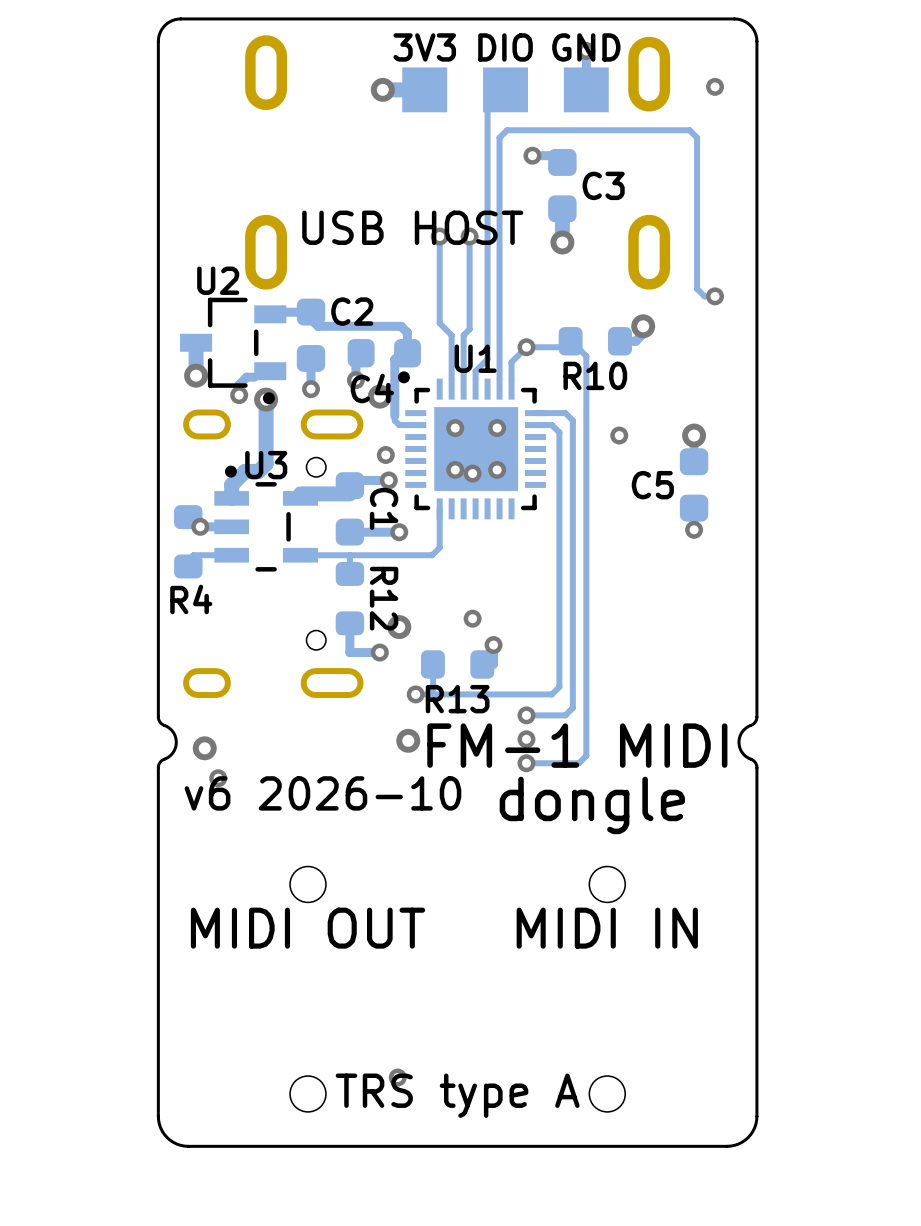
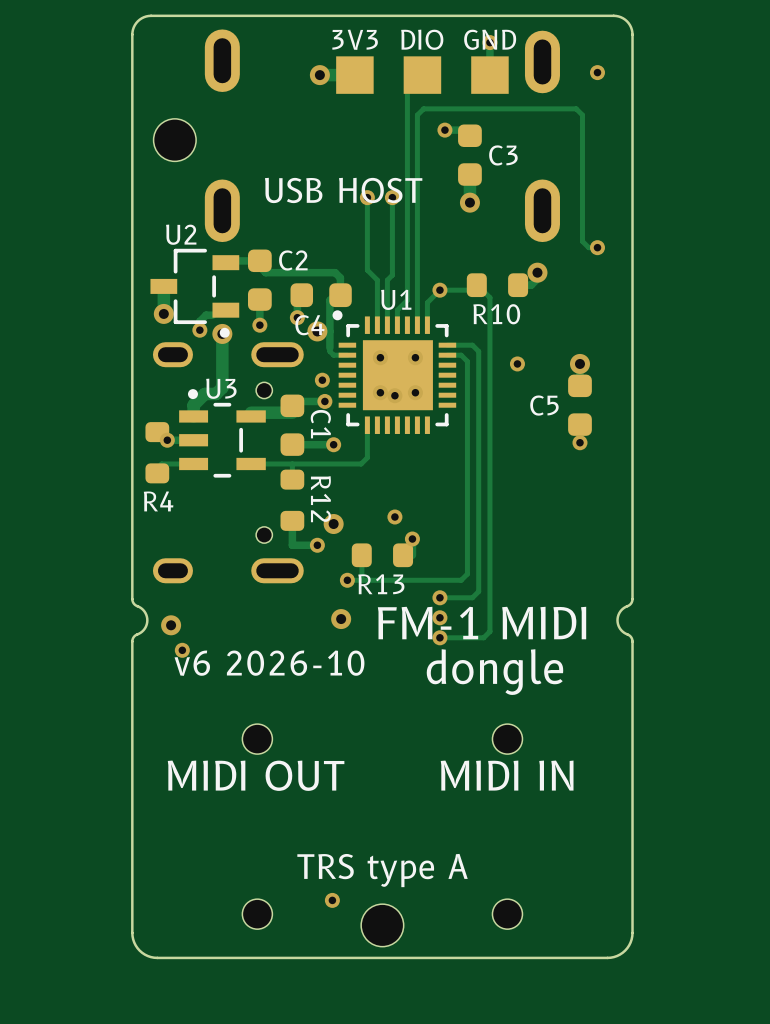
part: none -> (174, 140)
text position: TRS type A (457, 1095) -> TRS type A (382, 870)
part: none -> (382, 925)

